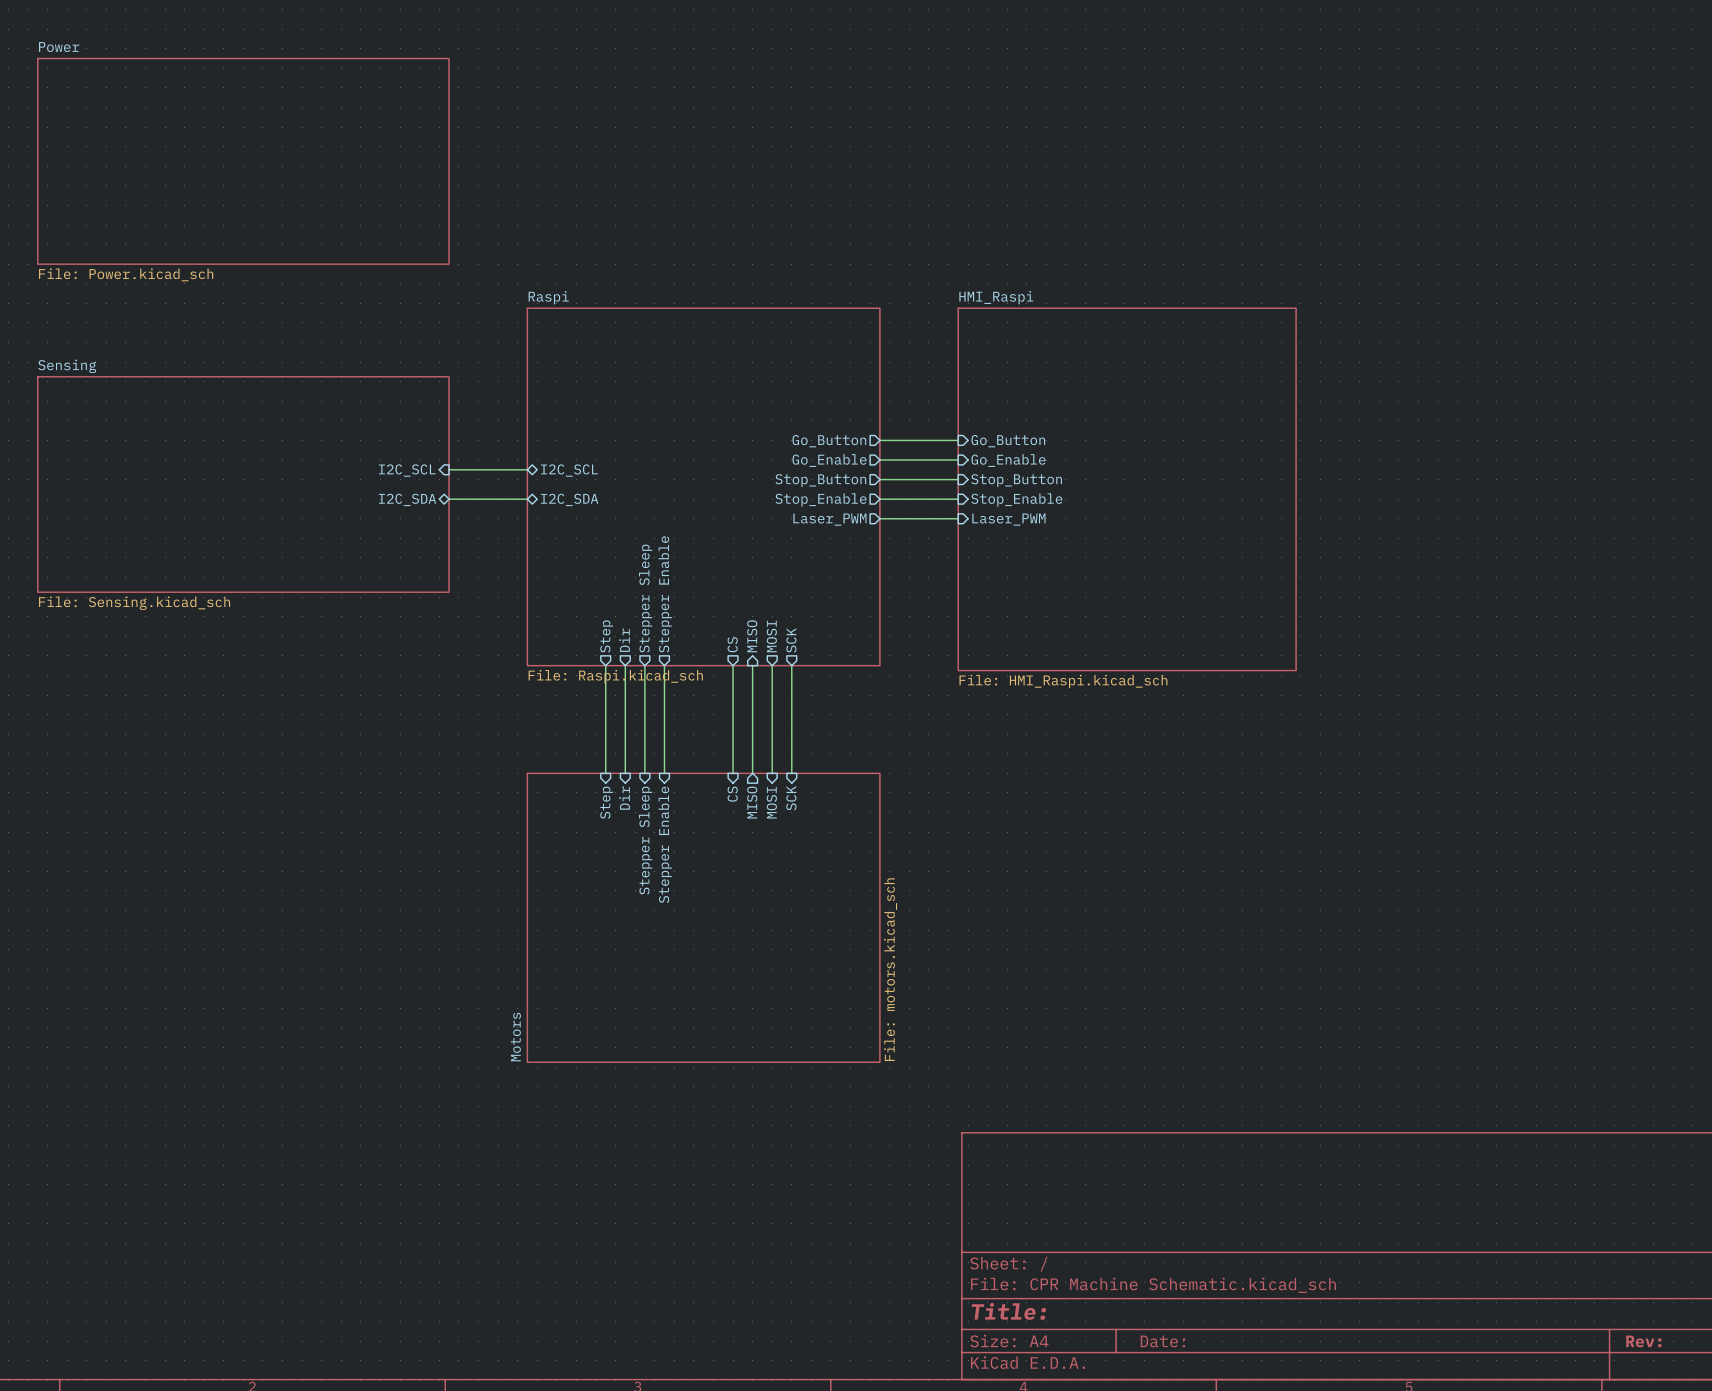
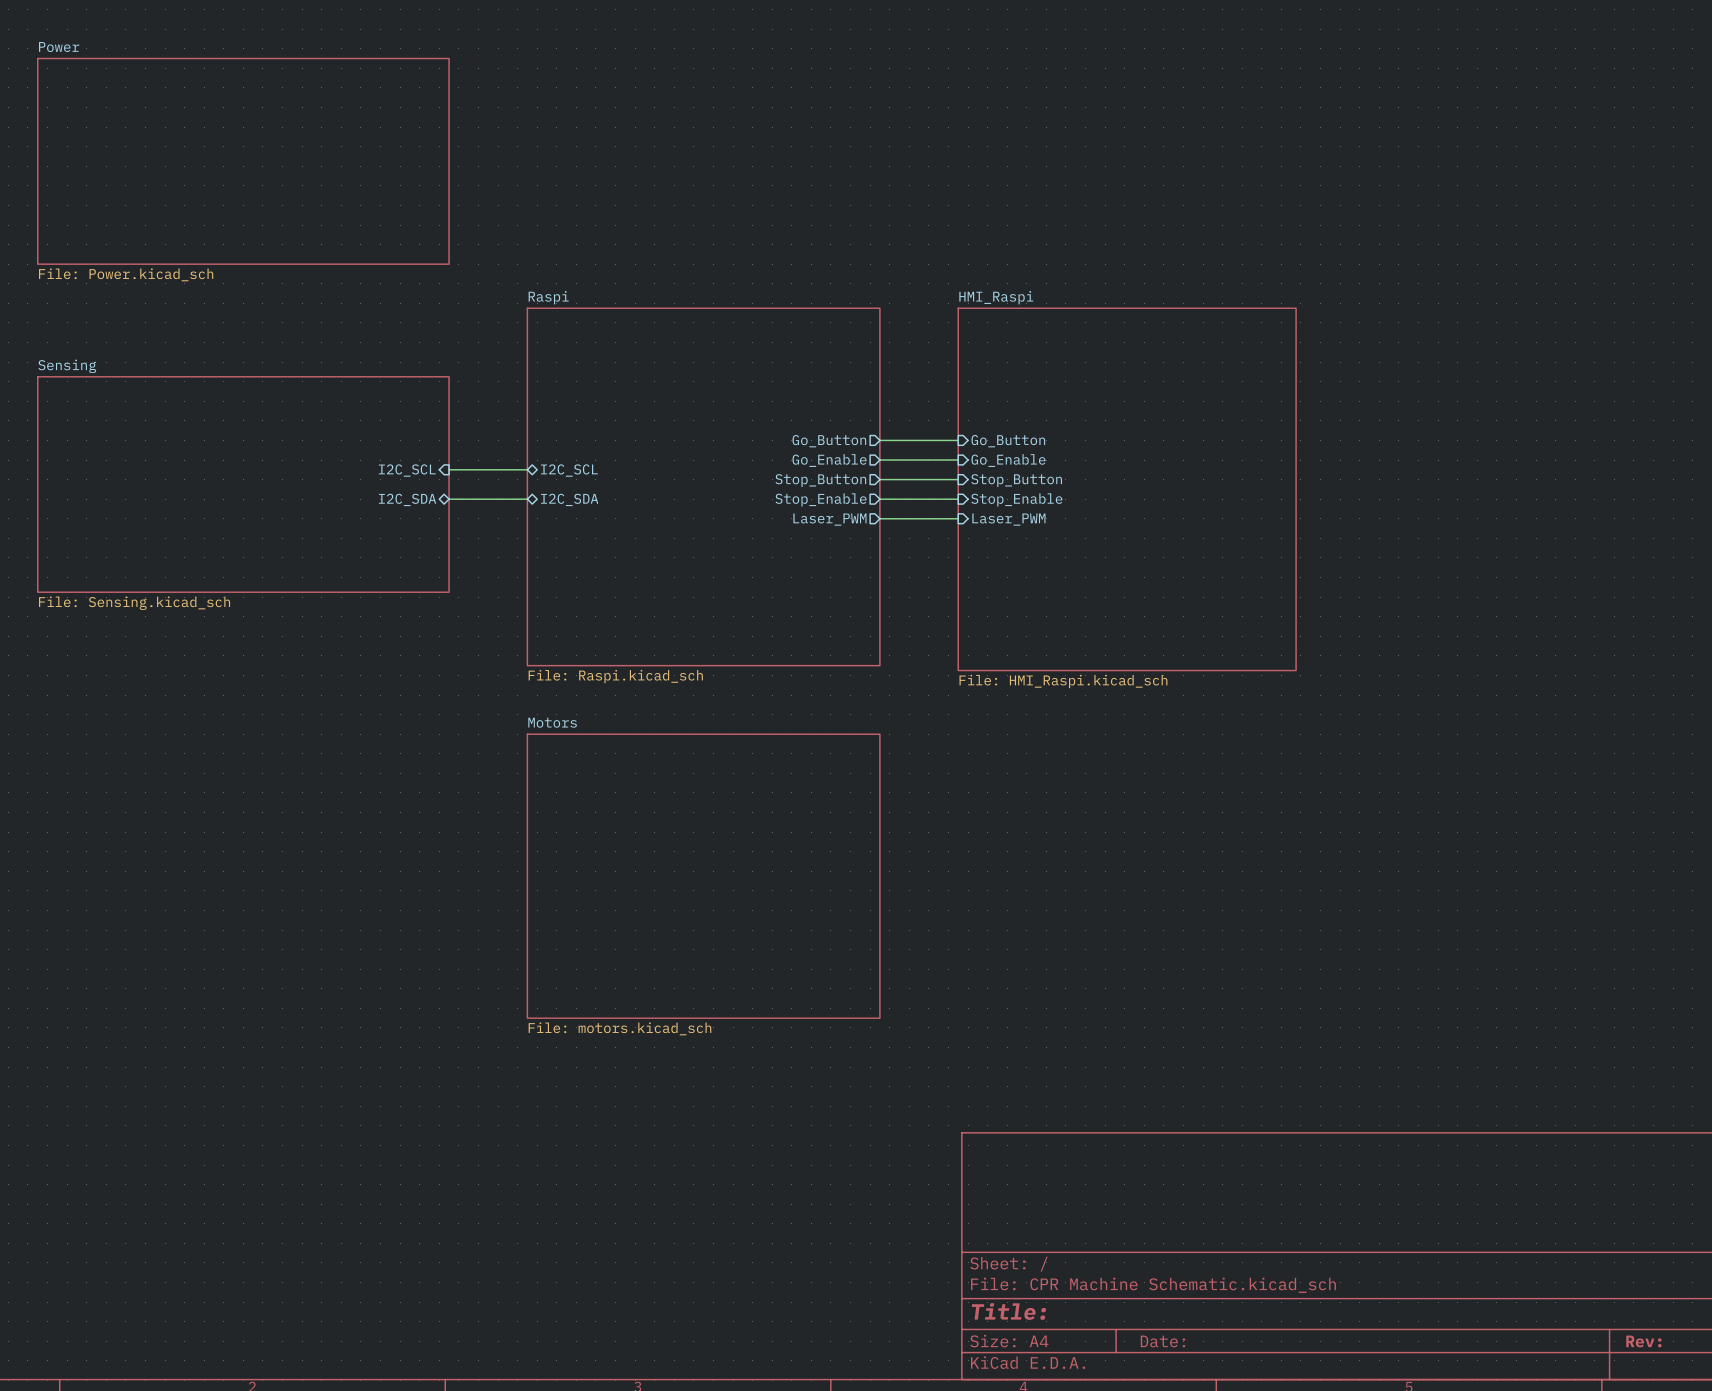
sheet pin: Stepper Enable (665, 594) -> none
sheet pin: Stepper Sleep (645, 598) -> none
sheet pin: Step (606, 636) -> none
sheet pin: MISO (752, 636) -> none
sheet pin: MOSI (771, 636) -> none
sheet pin: Dir (624, 640) -> none
sheet pin: SCK (791, 640) -> none
sheet pin: CS (732, 644) -> none
wire: (605, 665) (605, 773) -> none
wire: (625, 665) (625, 773) -> none
wire: (644, 665) (644, 773) -> none
wire: (664, 665) (664, 773) -> none
wire: (733, 665) (733, 773) -> none
wire: (752, 665) (752, 773) -> none
wire: (772, 665) (772, 773) -> none
wire: (791, 665) (791, 773) -> none
sheet pin: CS (732, 794) -> none
sheet pin: Dir (624, 798) -> none
sheet pin: SCK (791, 798) -> none
sheet pin: Step (606, 802) -> none
sheet pin: MISO (752, 802) -> none
sheet pin: MOSI (771, 802) -> none
sheet pin: Stepper Sleep (645, 840) -> none
sheet pin: Stepper Enable (665, 844) -> none
sheet Motors: none -> File: motors.kicad_sch (703, 876)
sheet Motors: File: motors.kicad_sch (703, 917) -> none

